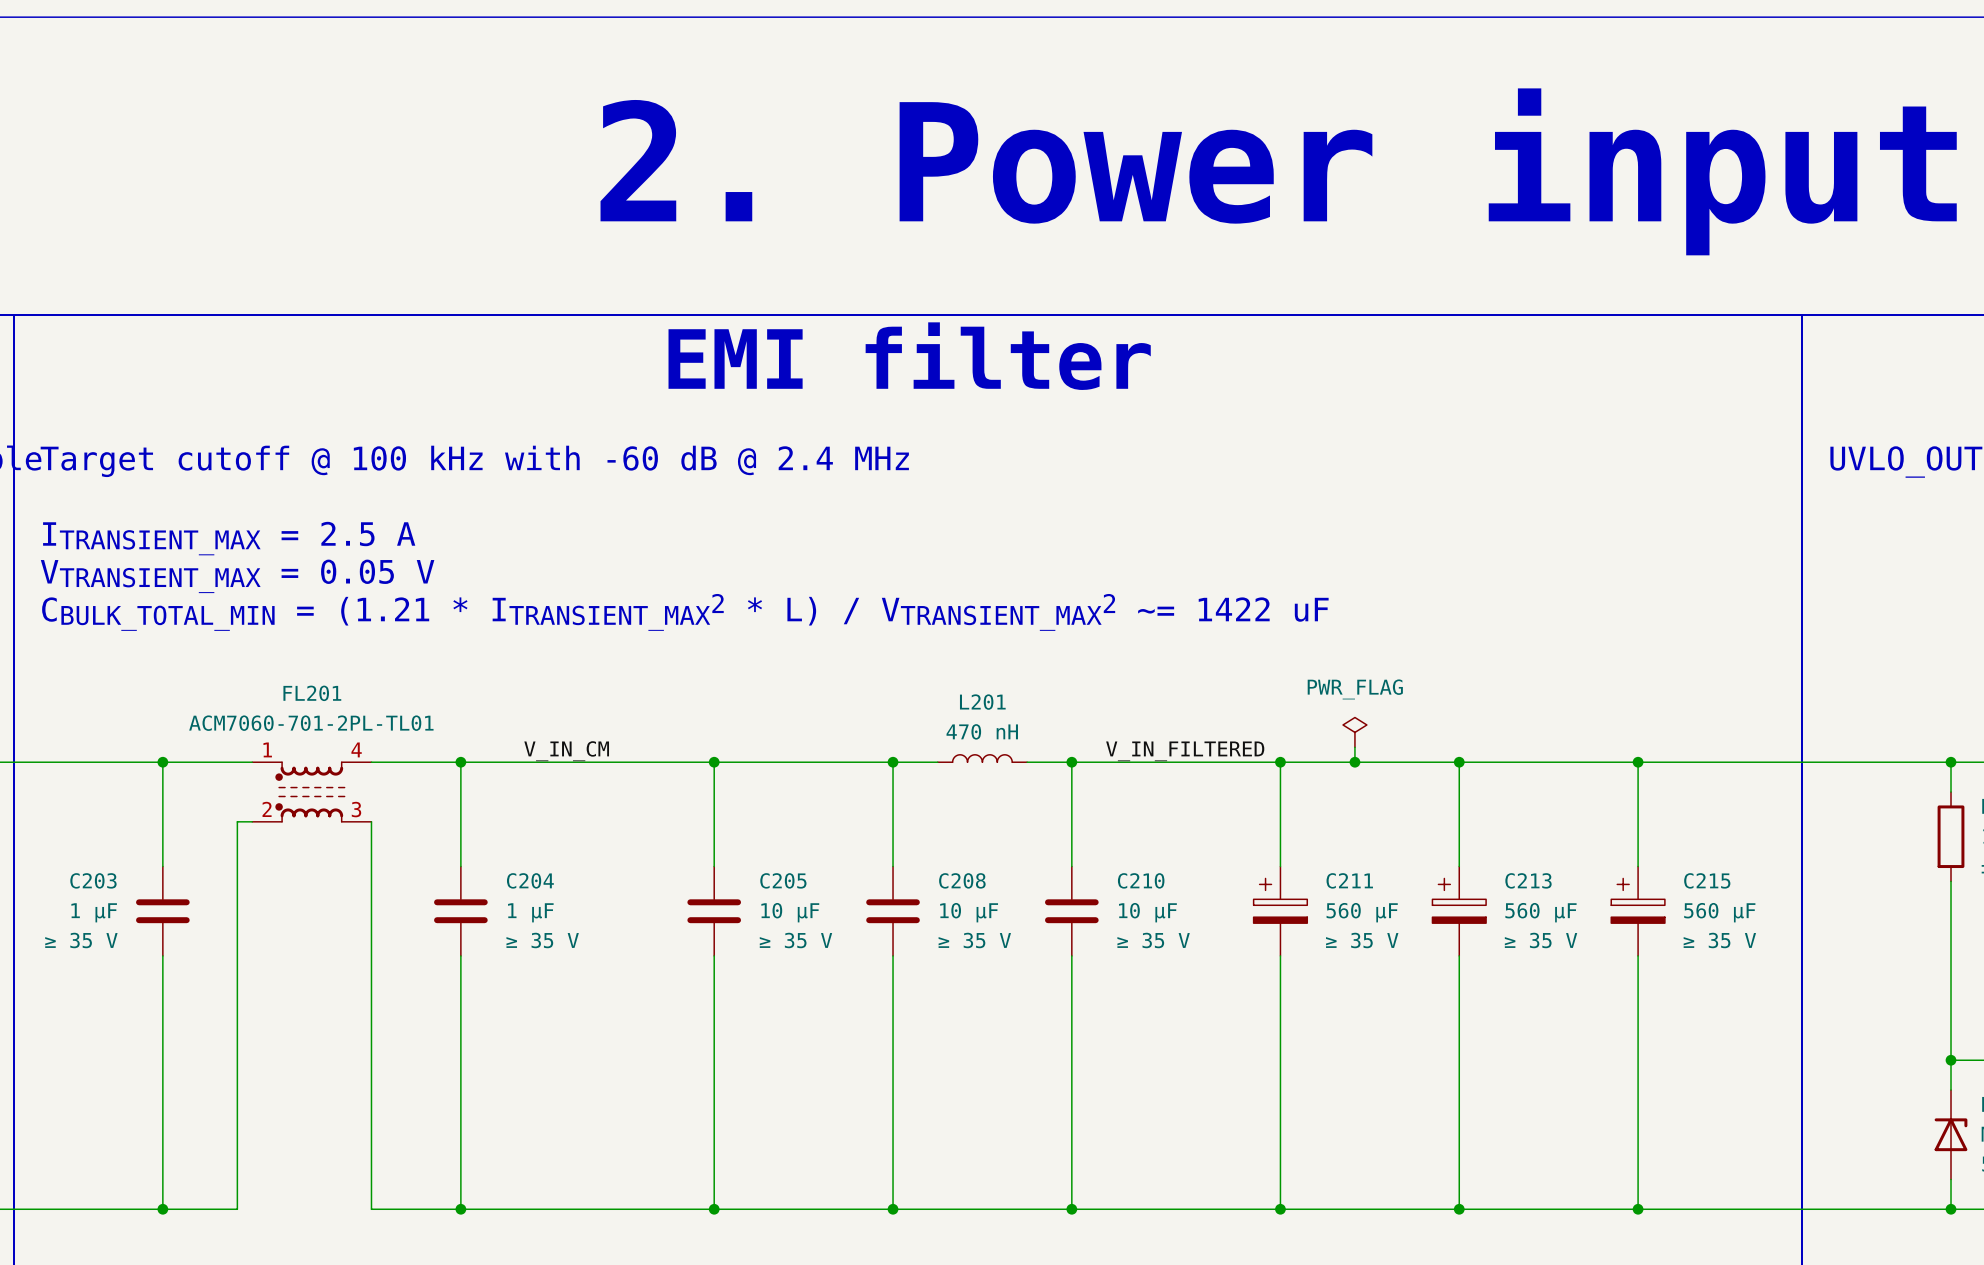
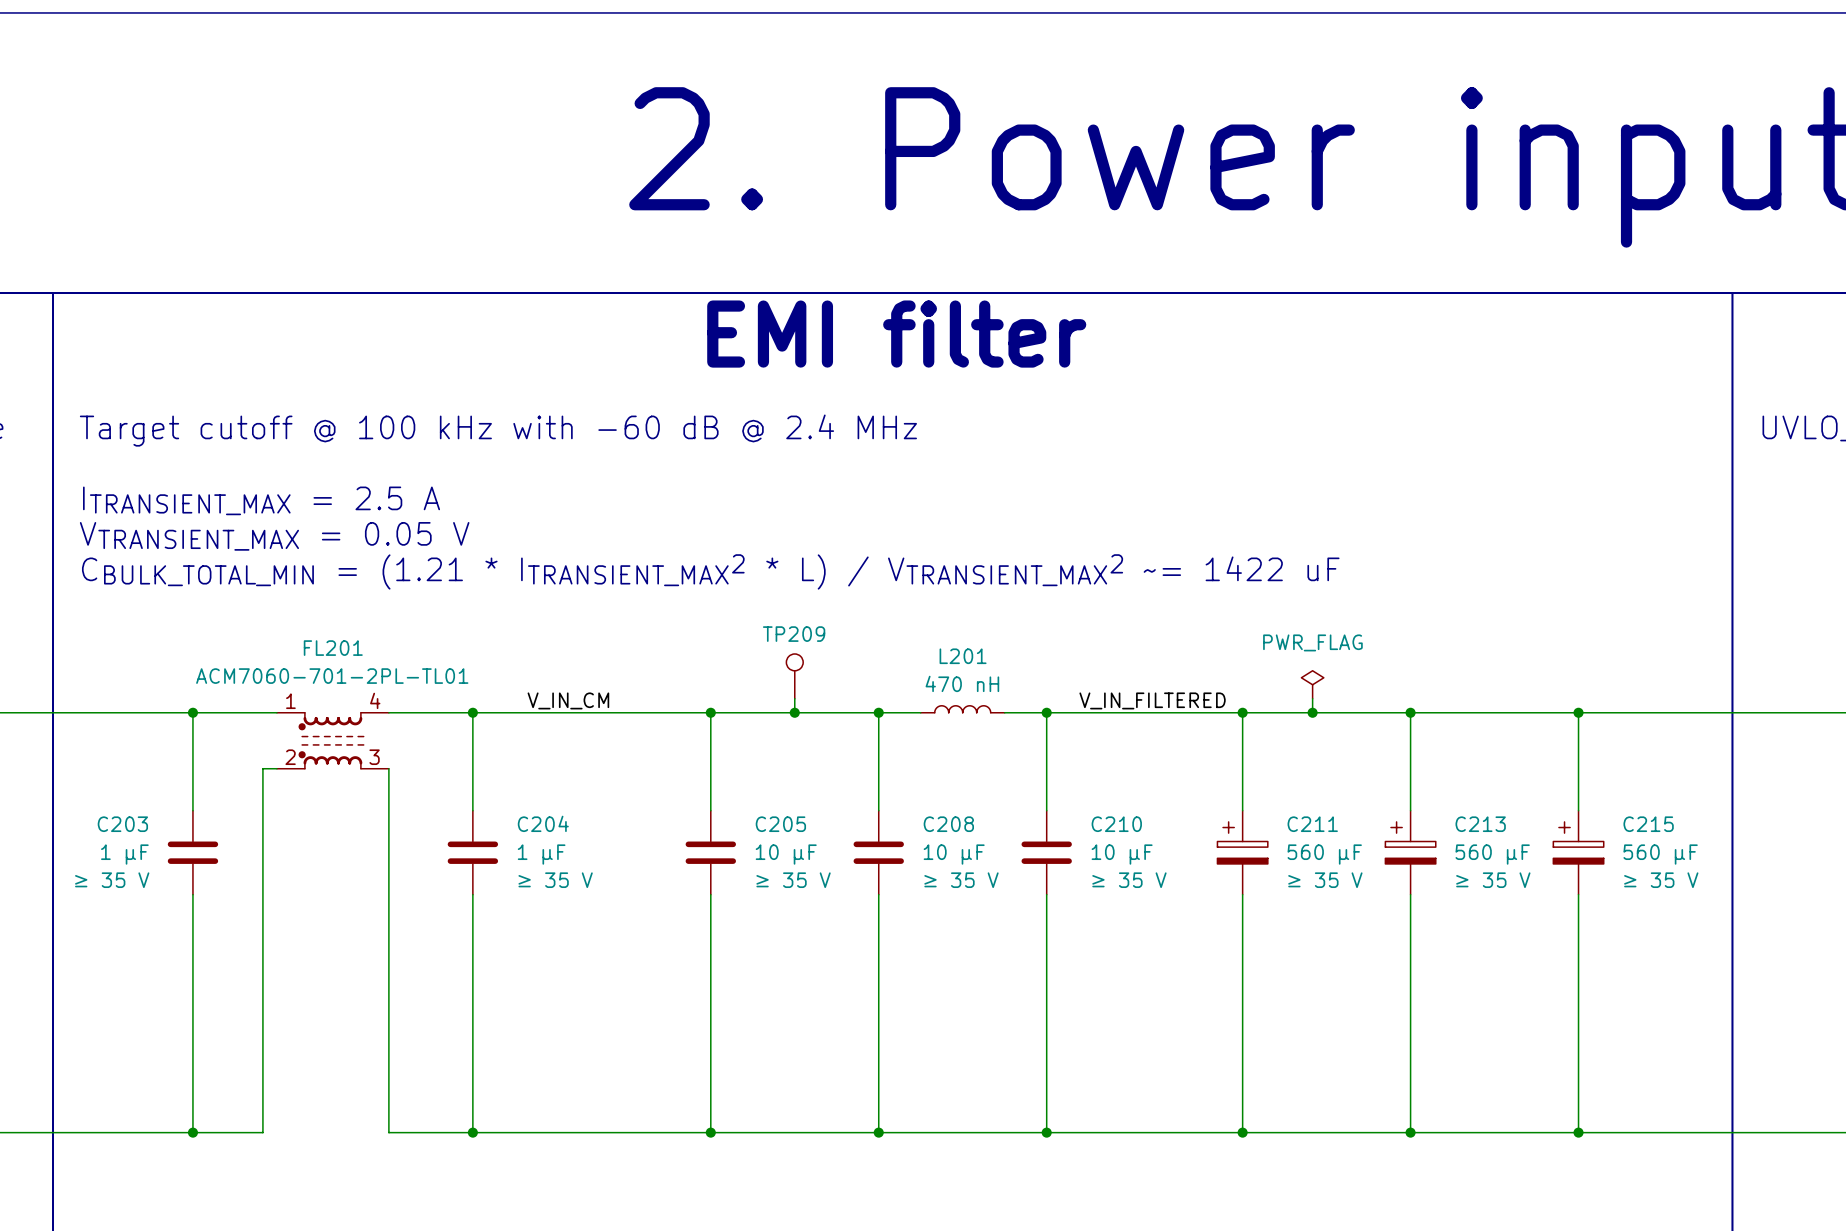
TP209: none -> (794, 676)
wire: none -> (794, 698) (794, 712)
junction: none -> (794, 712)

